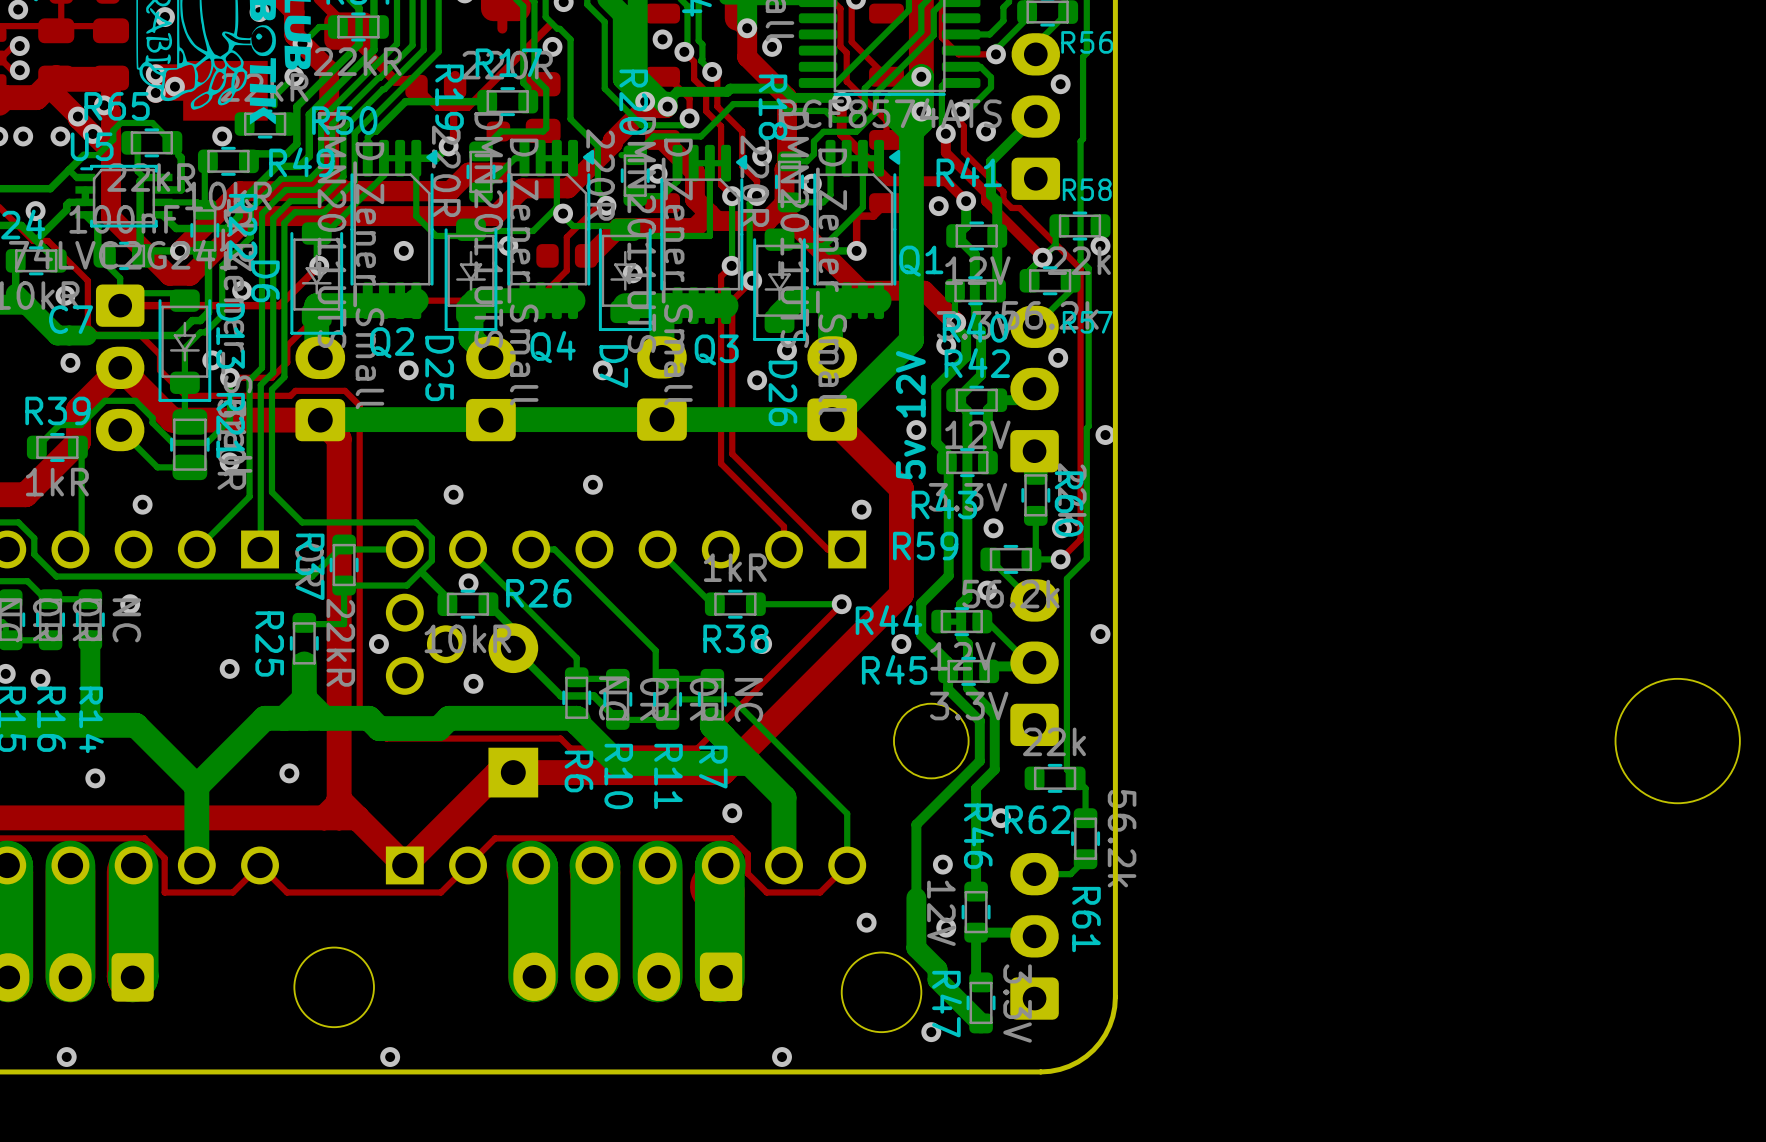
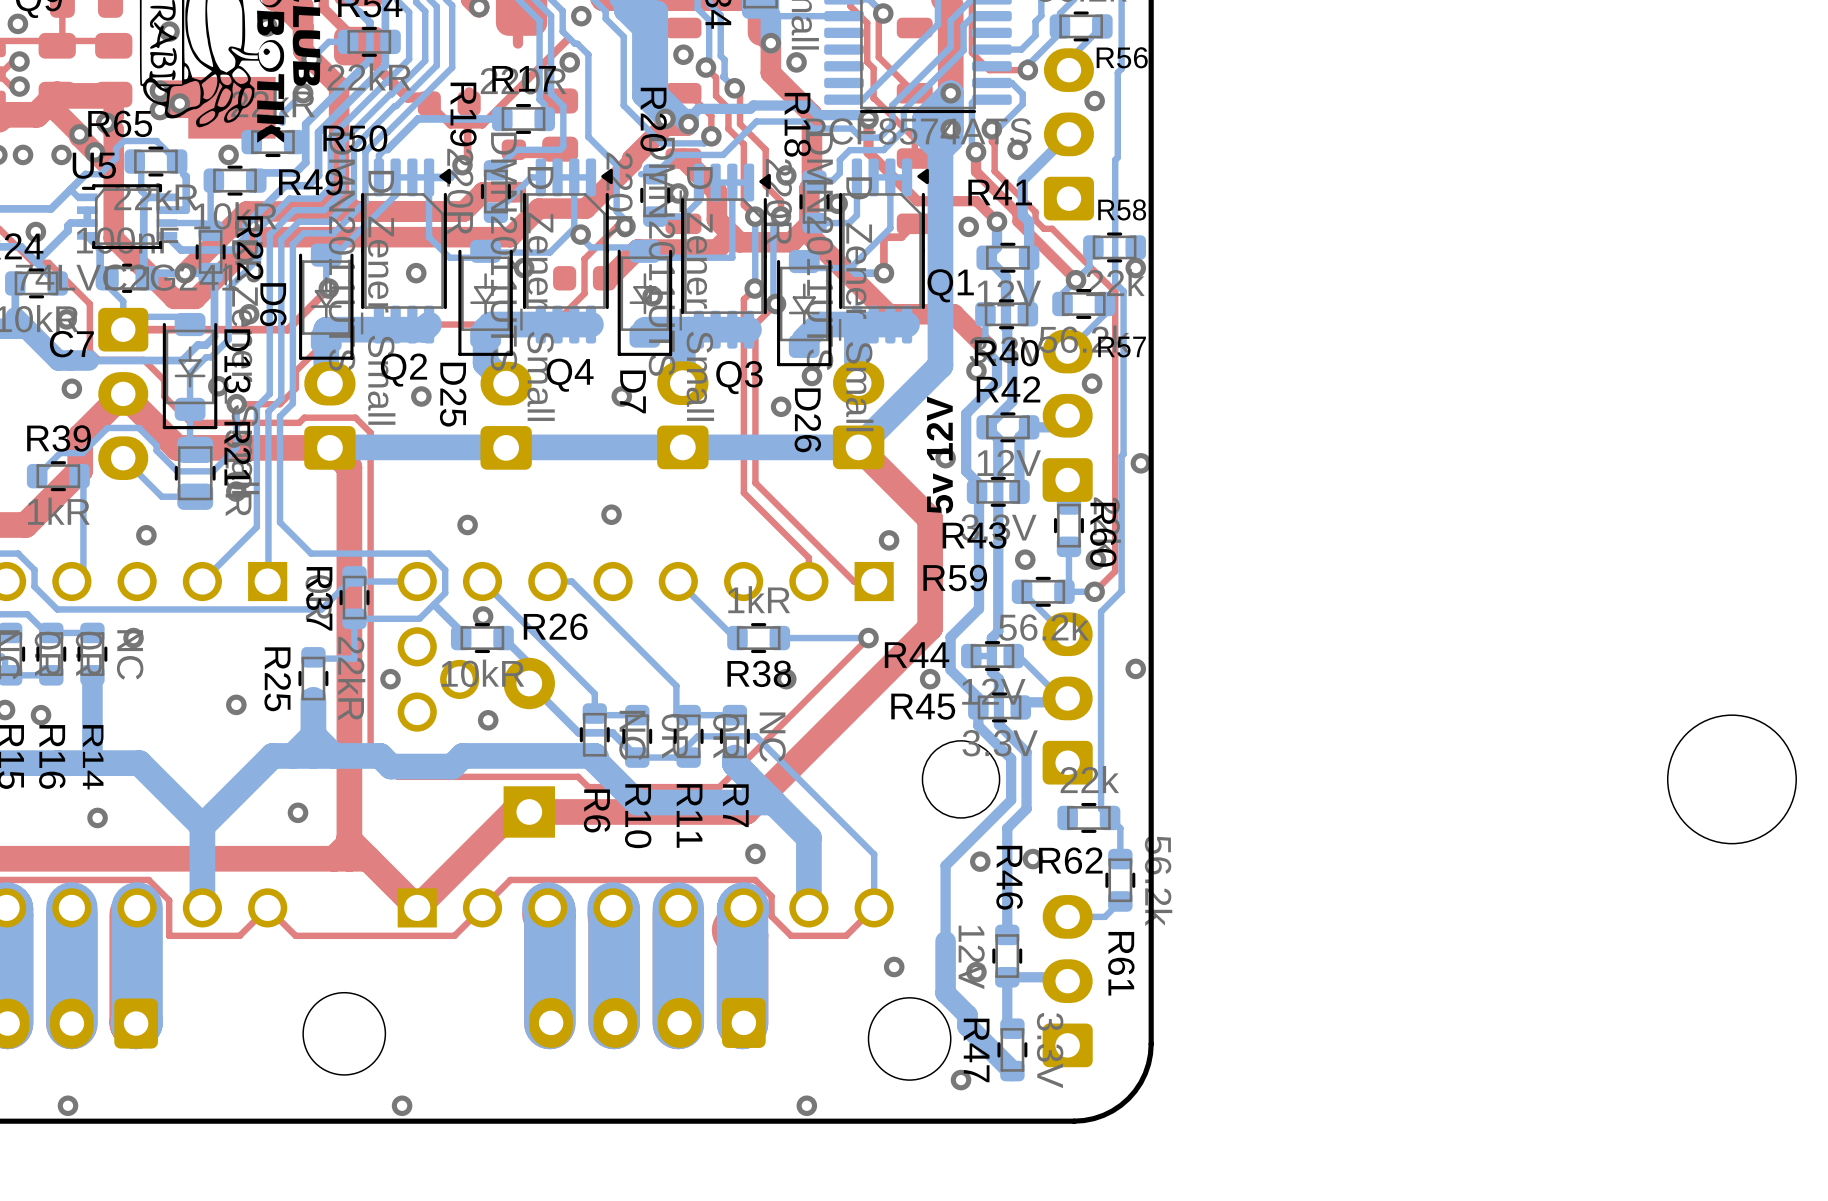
via: (987, 590) -> none
via position: (942, 864) -> (980, 861)

